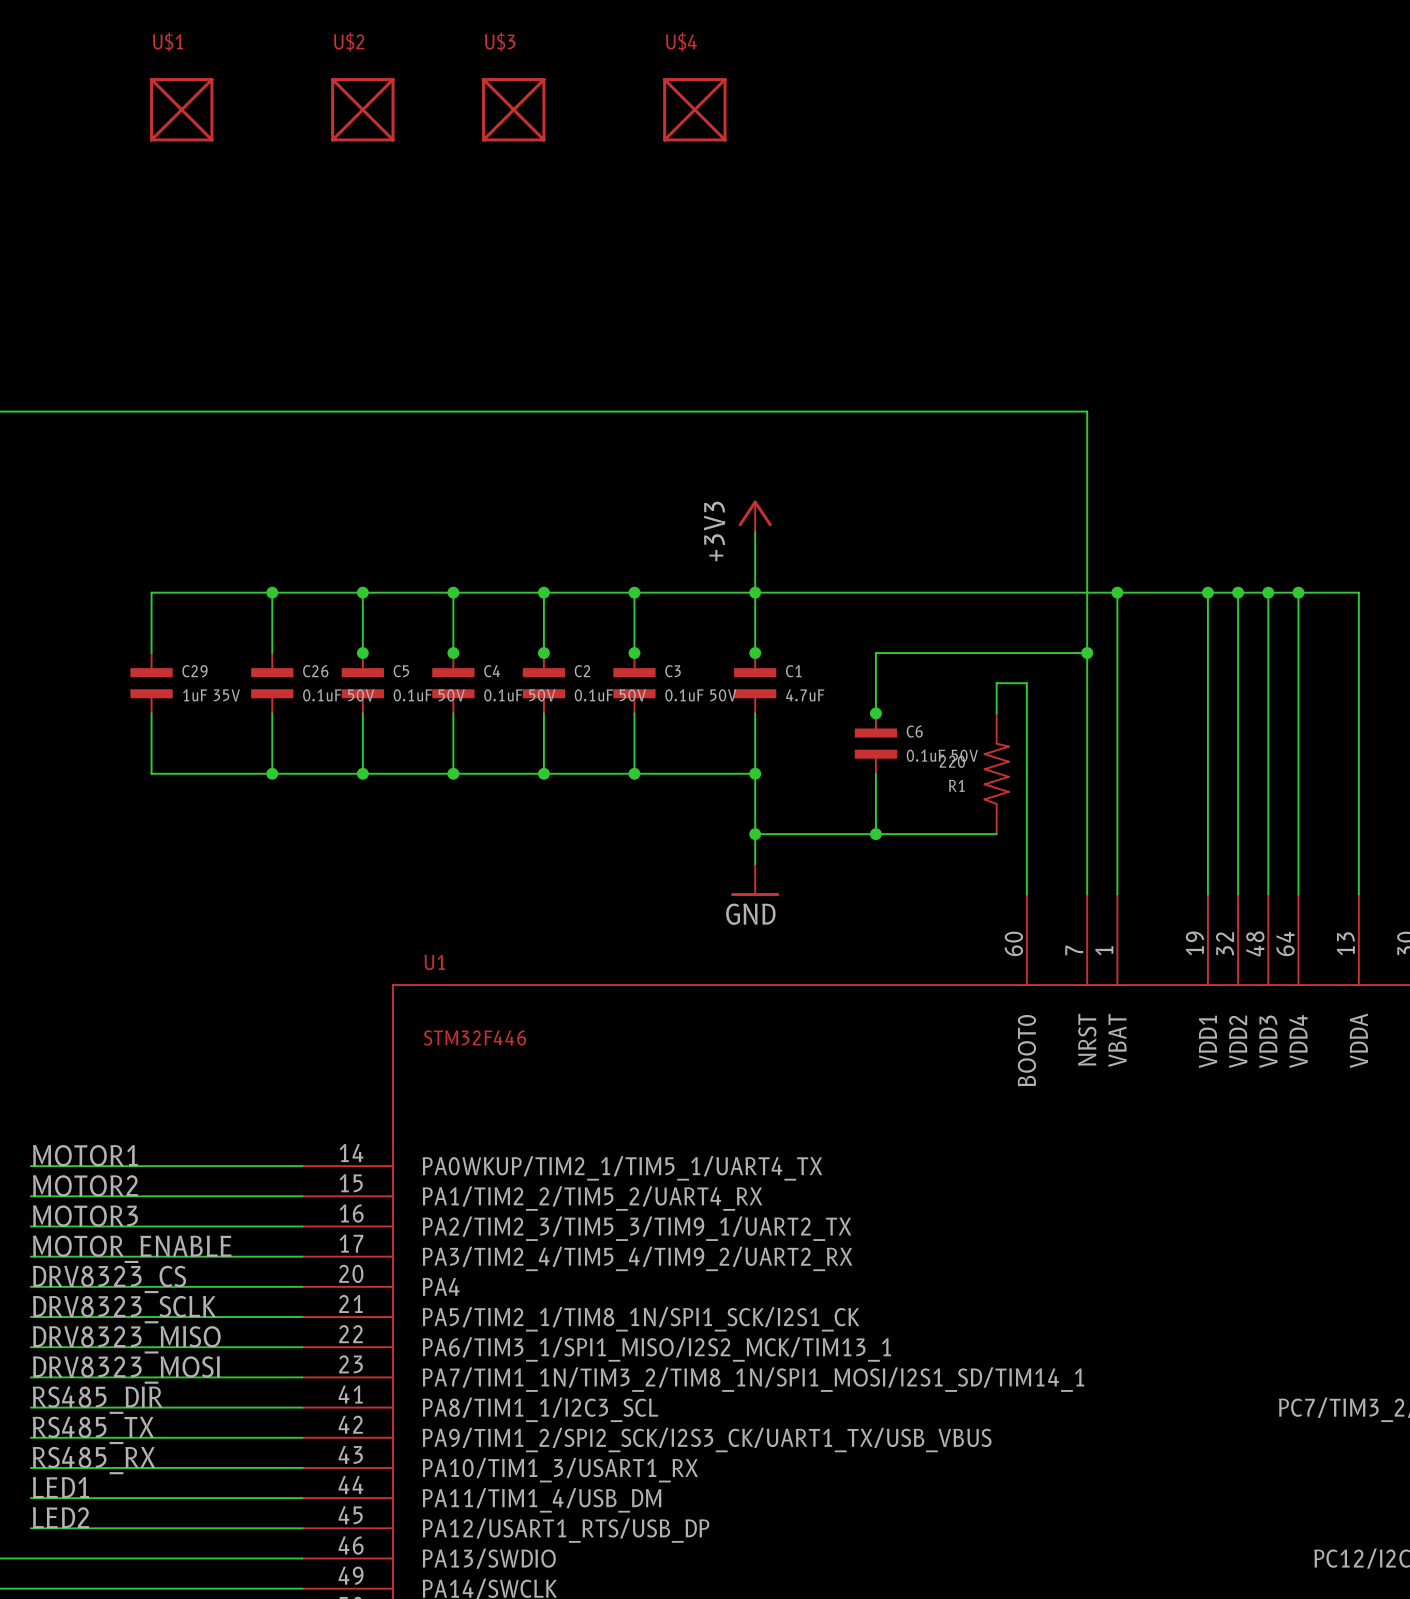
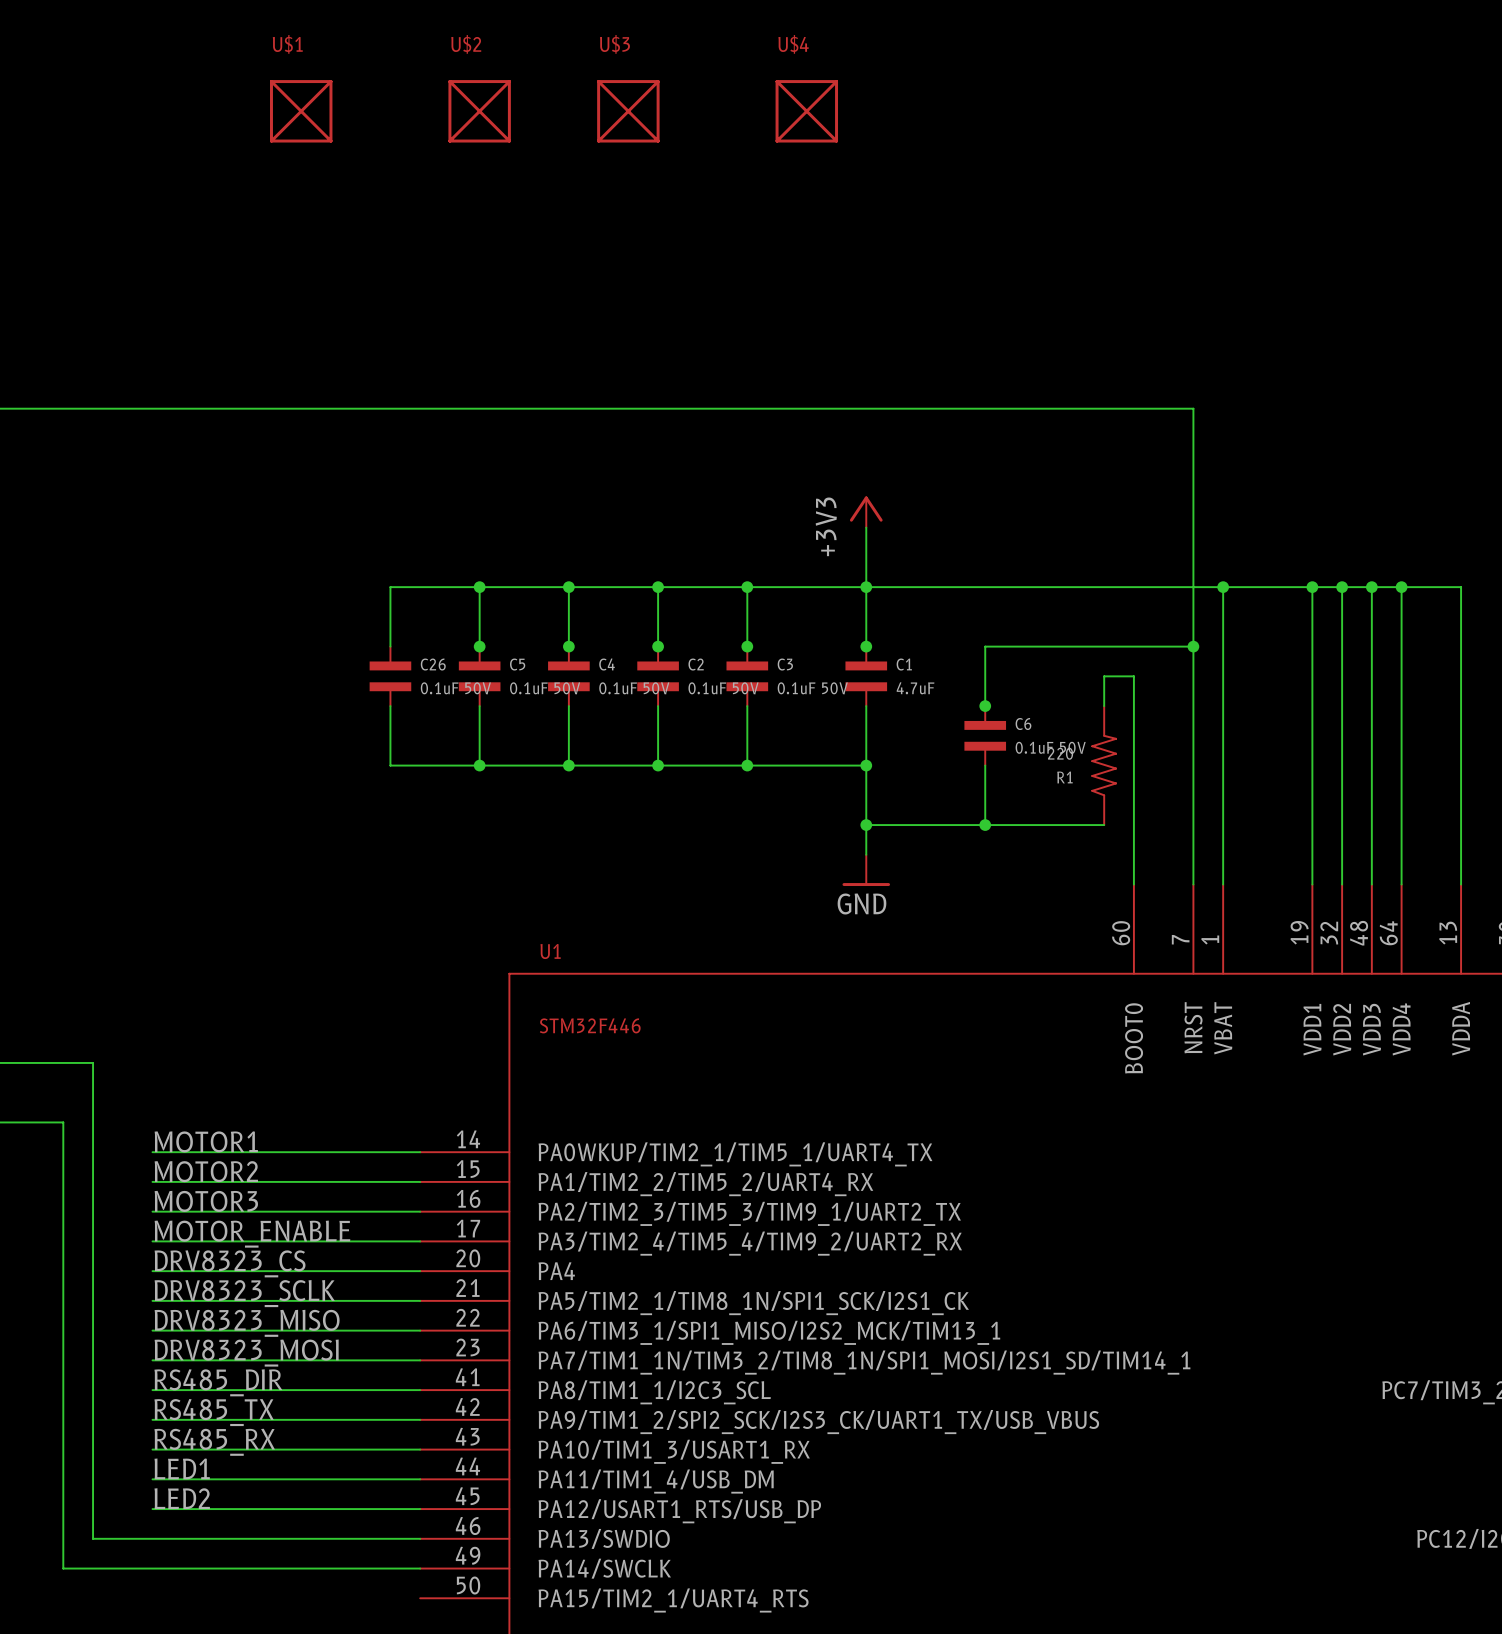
wire: (272, 592) (151, 592) (151, 653) -> none
junction: (272, 592) -> none
C29: 1uF 35V (151, 683) -> none
wire: (151, 713) (151, 773) (272, 773) -> none
junction: (272, 773) -> none

